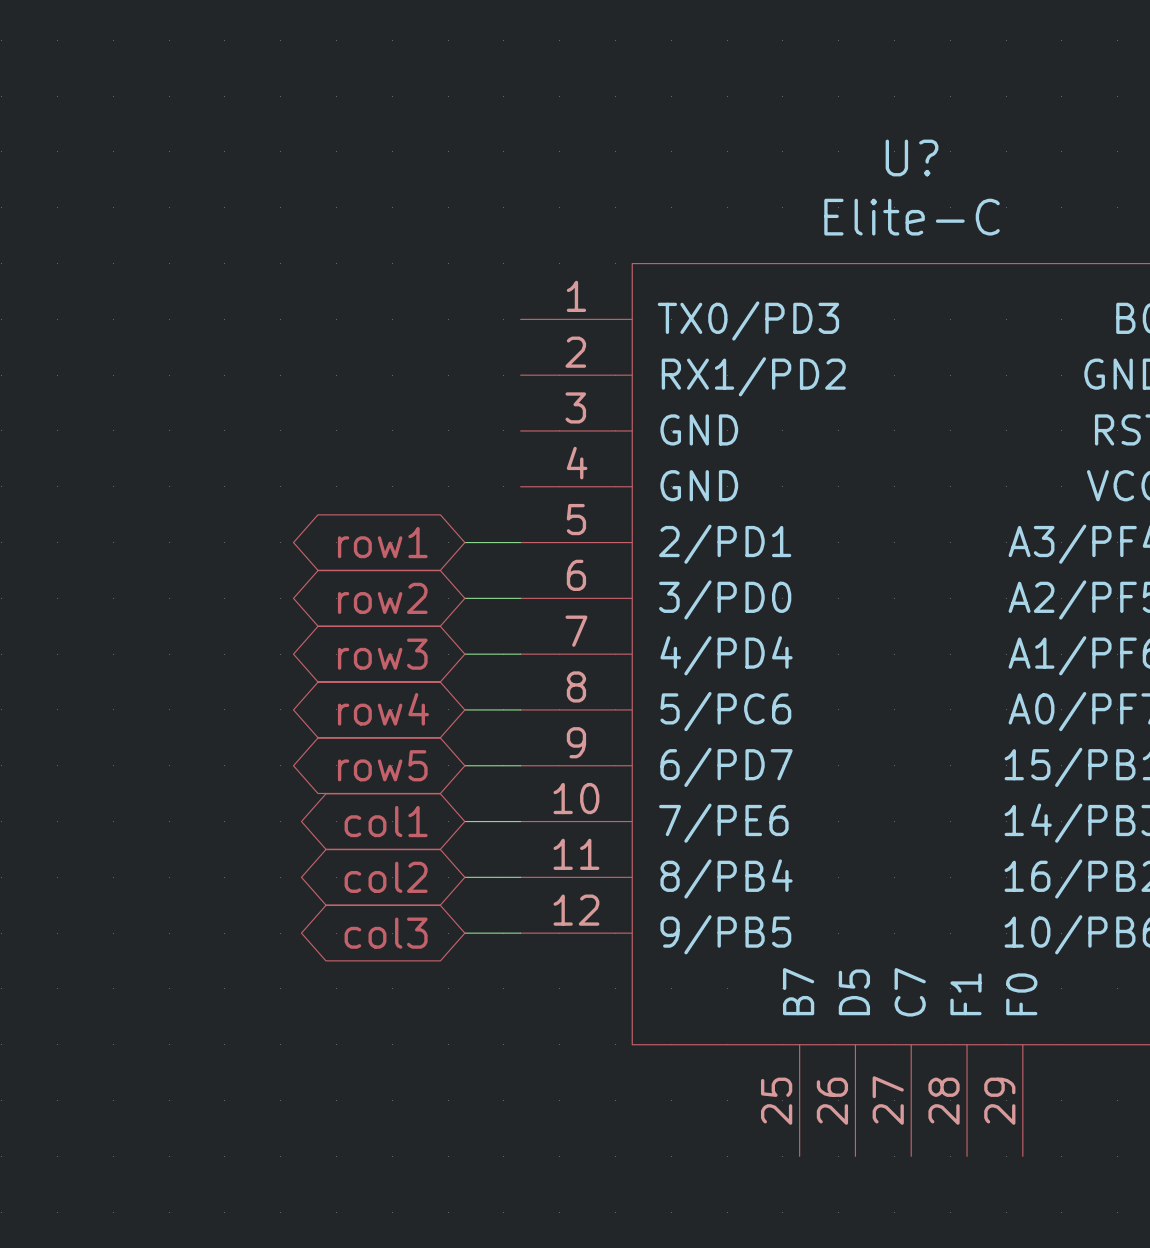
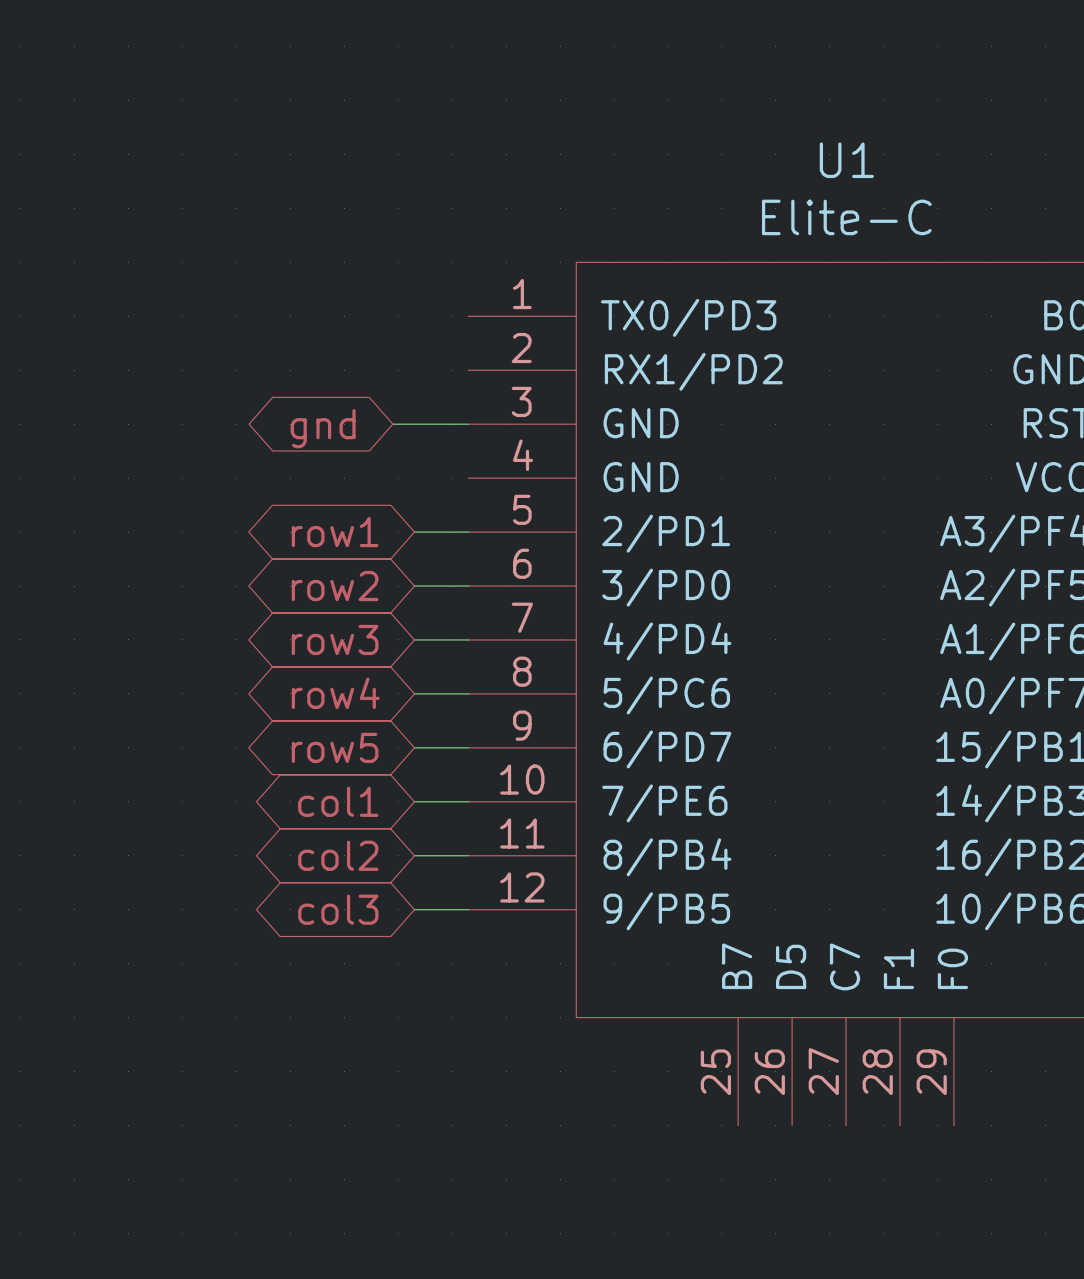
U? name: U? (912, 157) -> U1 (846, 160)
wire: none -> (392, 424) (468, 424)
global label: none -> gnd (323, 428)

